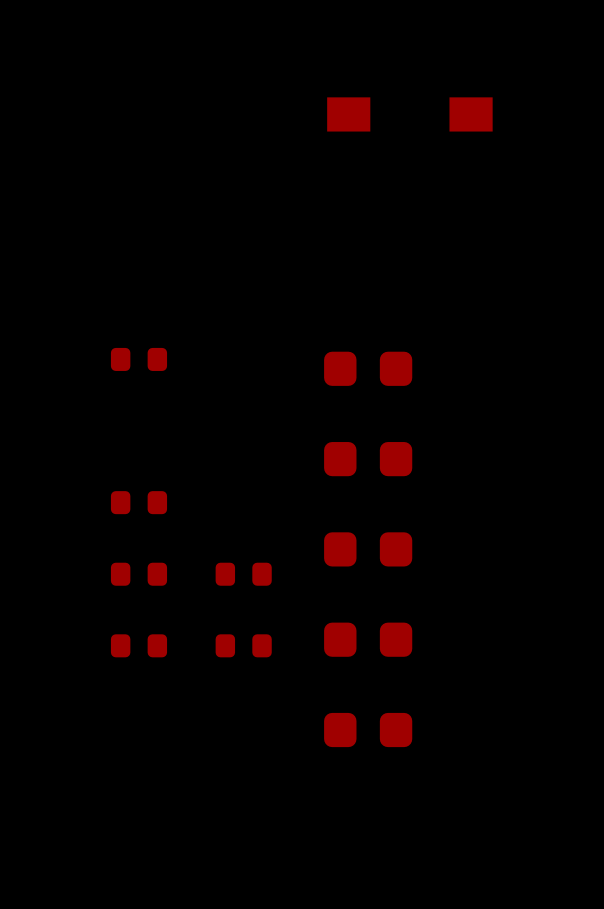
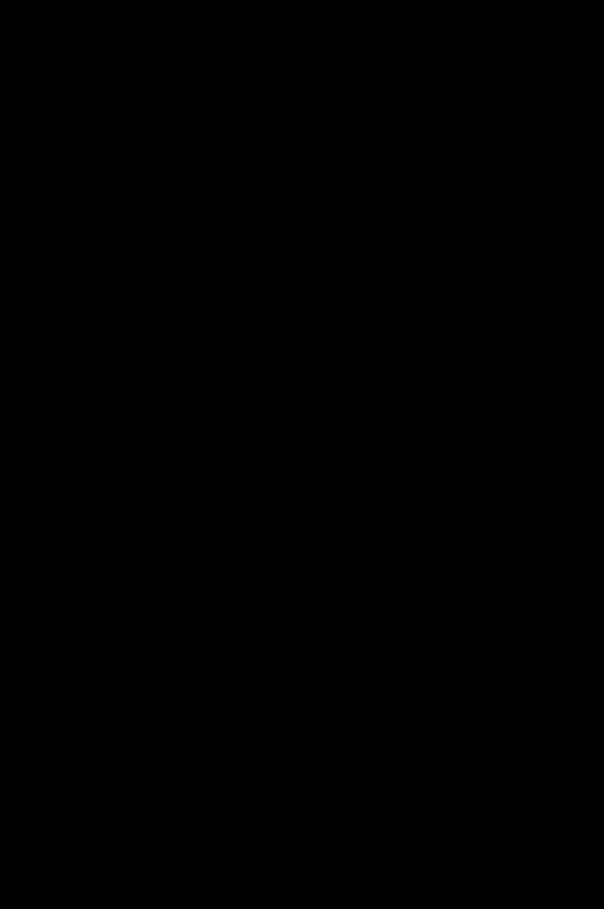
part: (409, 114) -> none
part: (138, 359) -> none
part: (368, 368) -> none
part: (368, 459) -> none
part: (138, 502) -> none
part: (368, 549) -> none
part: (138, 574) -> none
part: (243, 574) -> none
part: (368, 639) -> none
part: (138, 645) -> none
part: (243, 645) -> none
part: (368, 730) -> none

